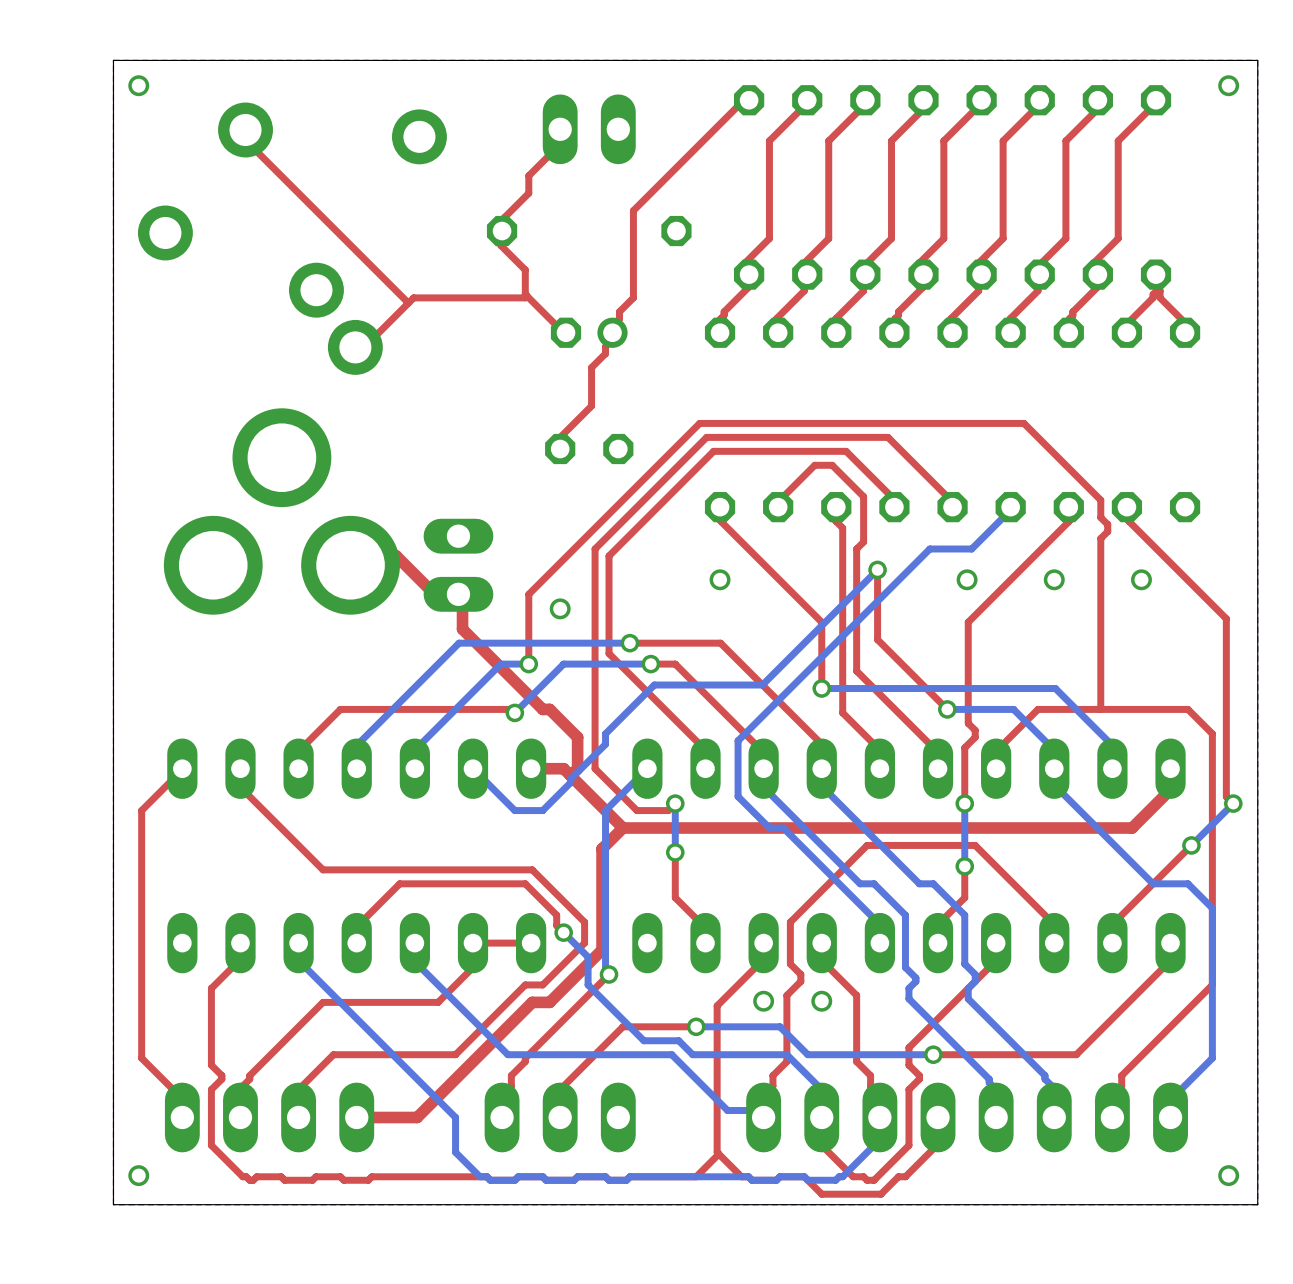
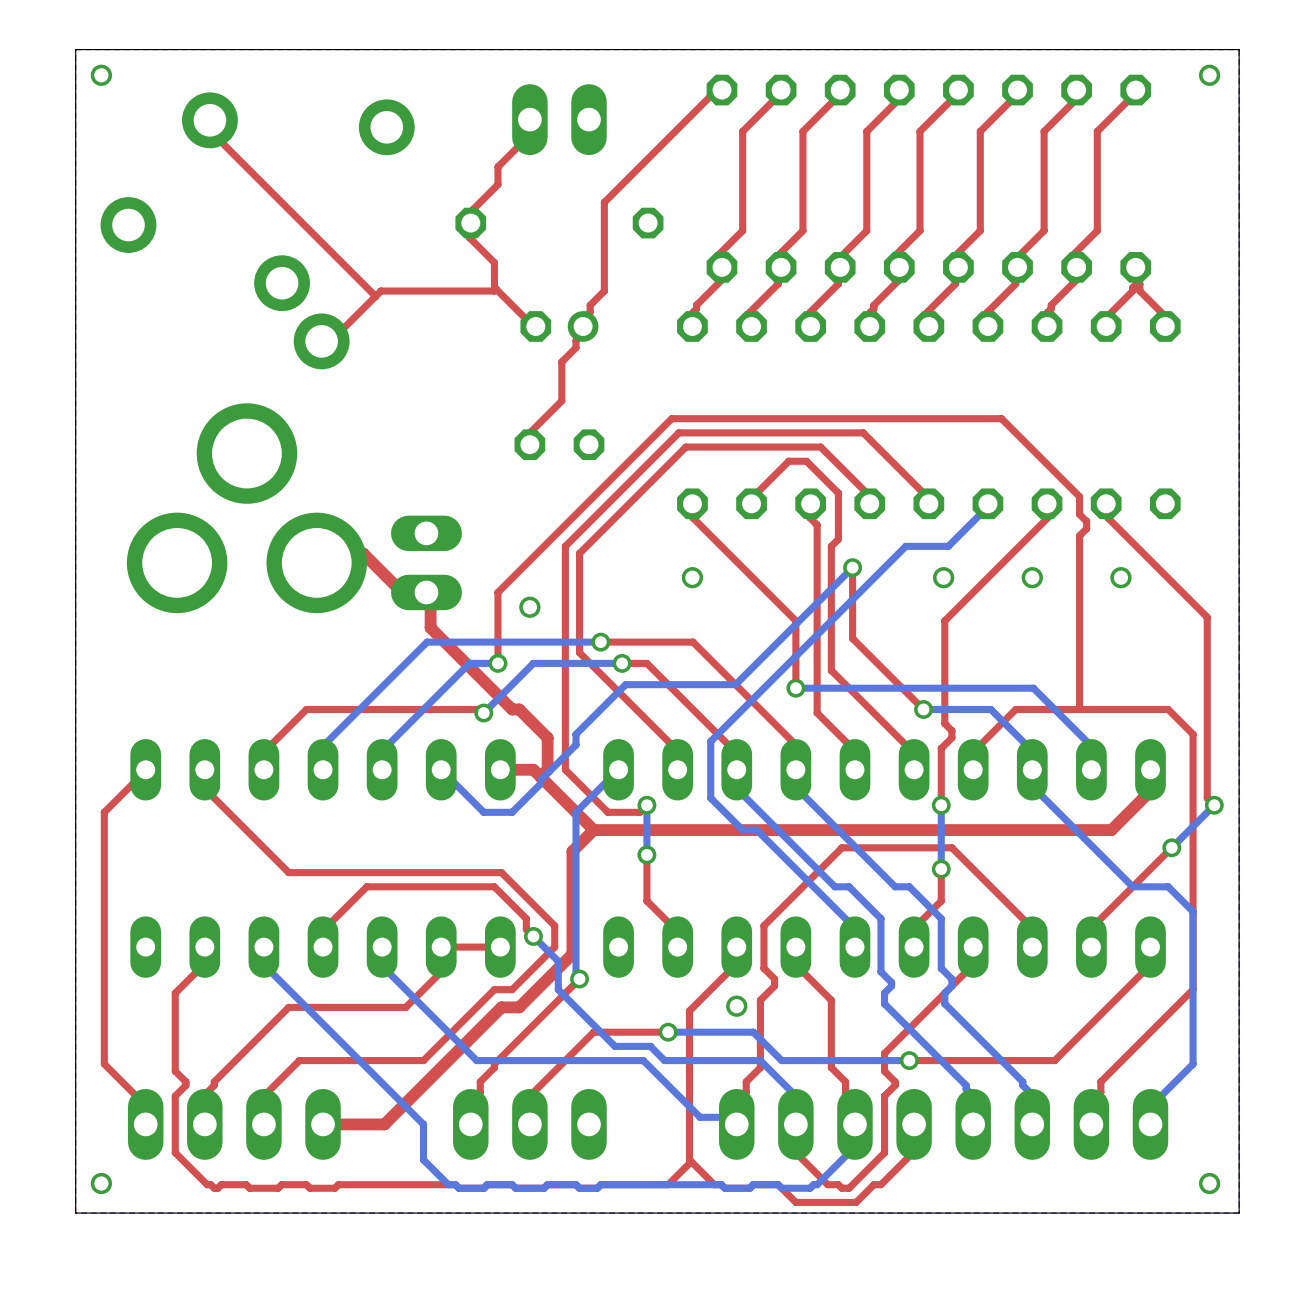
via: (821, 1001) -> none

